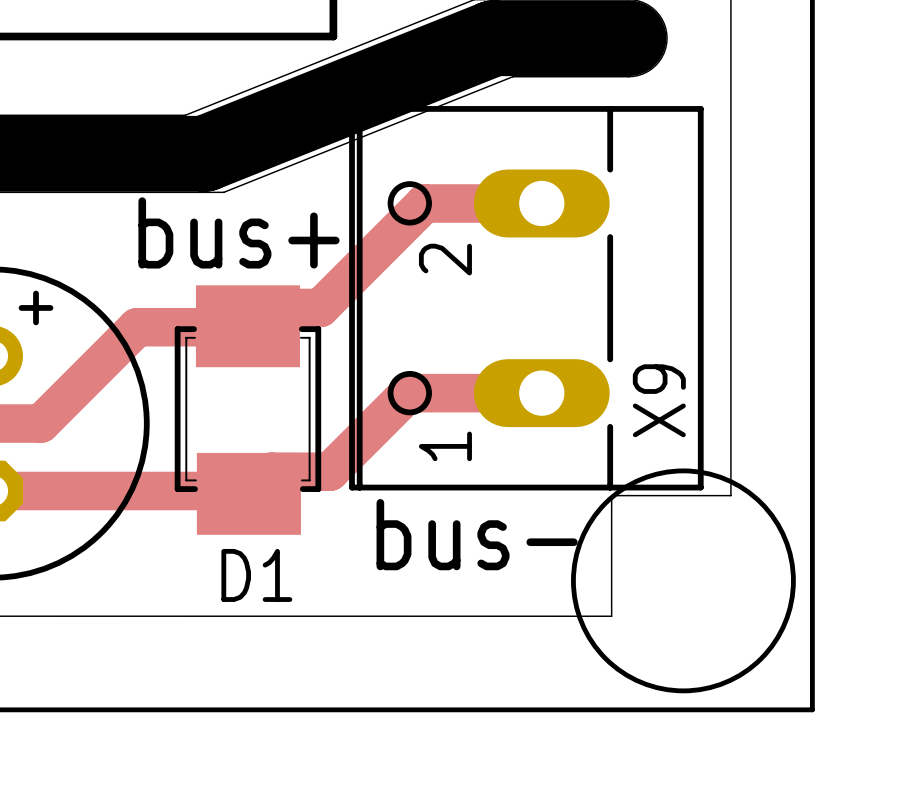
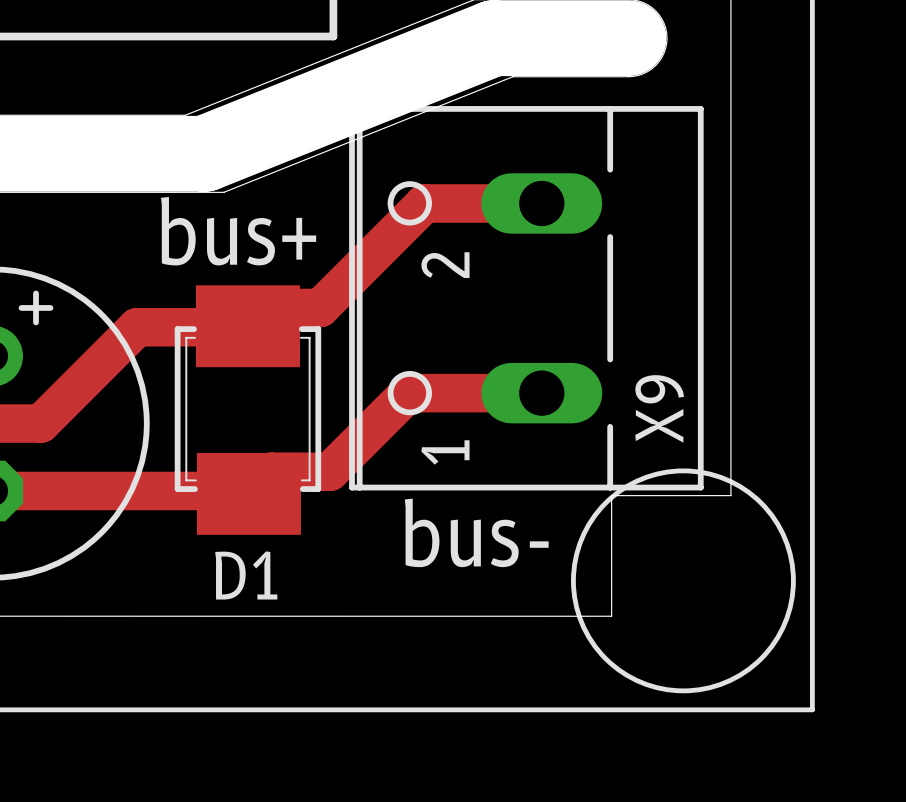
X9 footprint: [349, 106, 704, 491] -> [349, 106, 704, 491]

